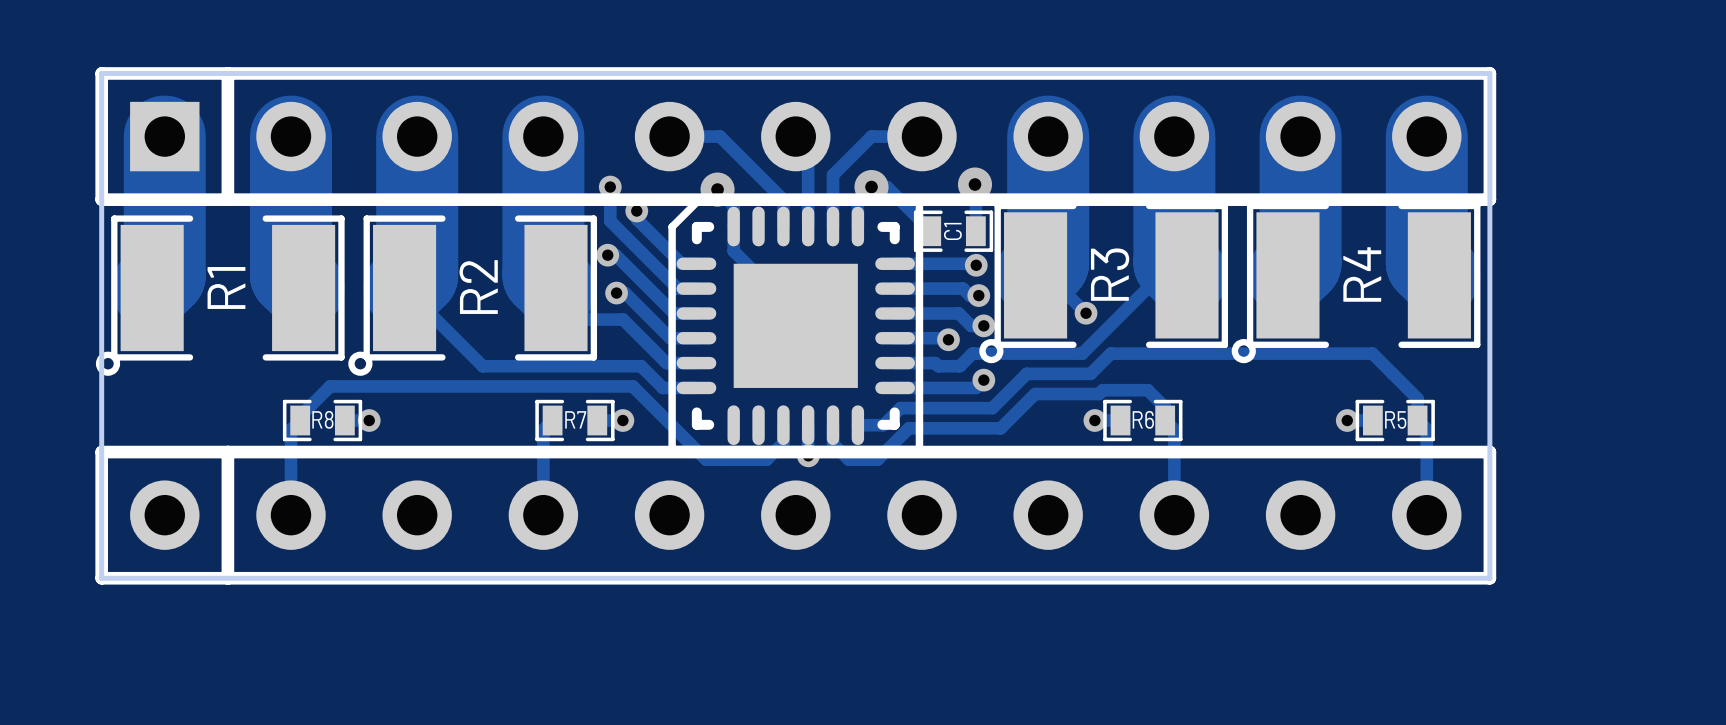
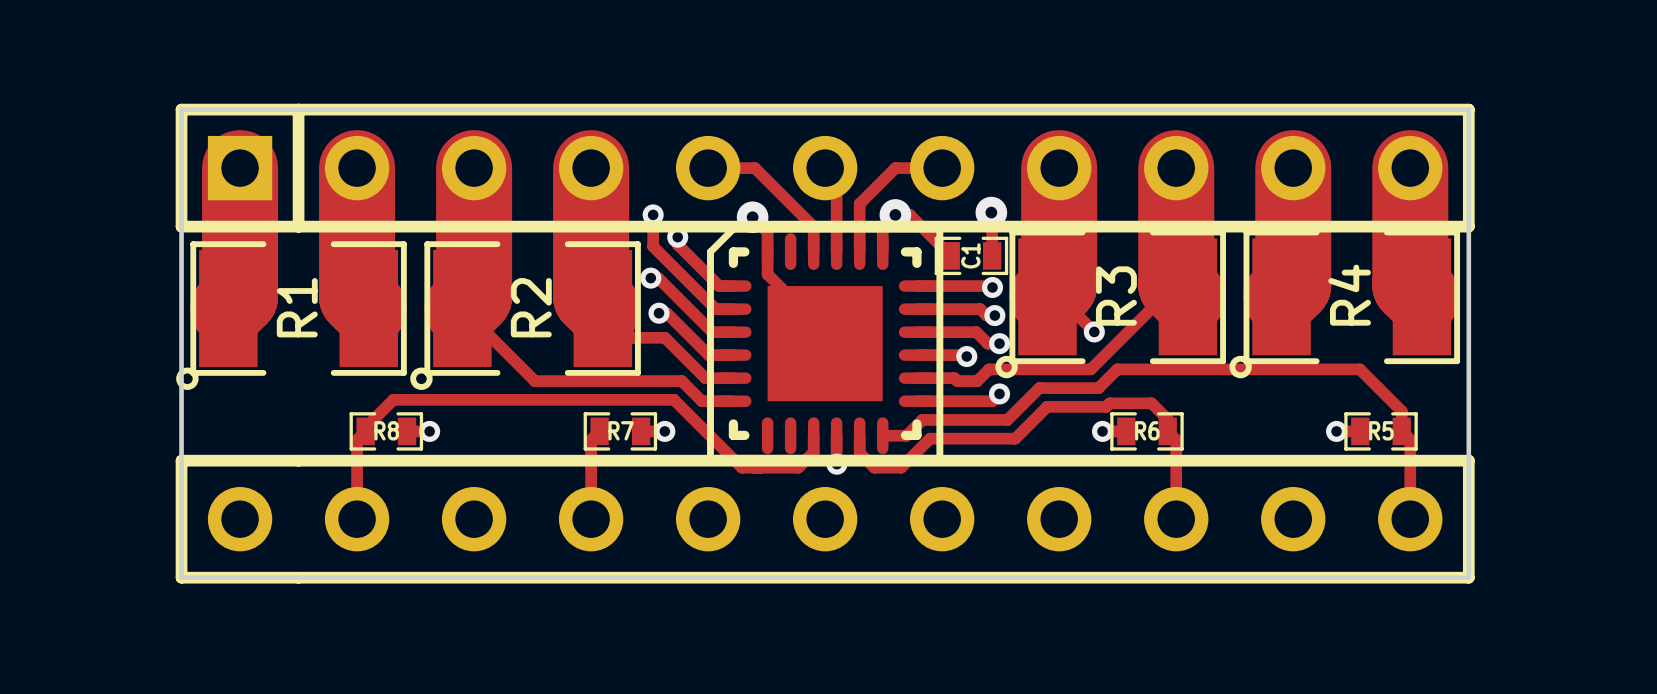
part footprint: [95, 445, 1497, 585] -> [175, 454, 1475, 584]

